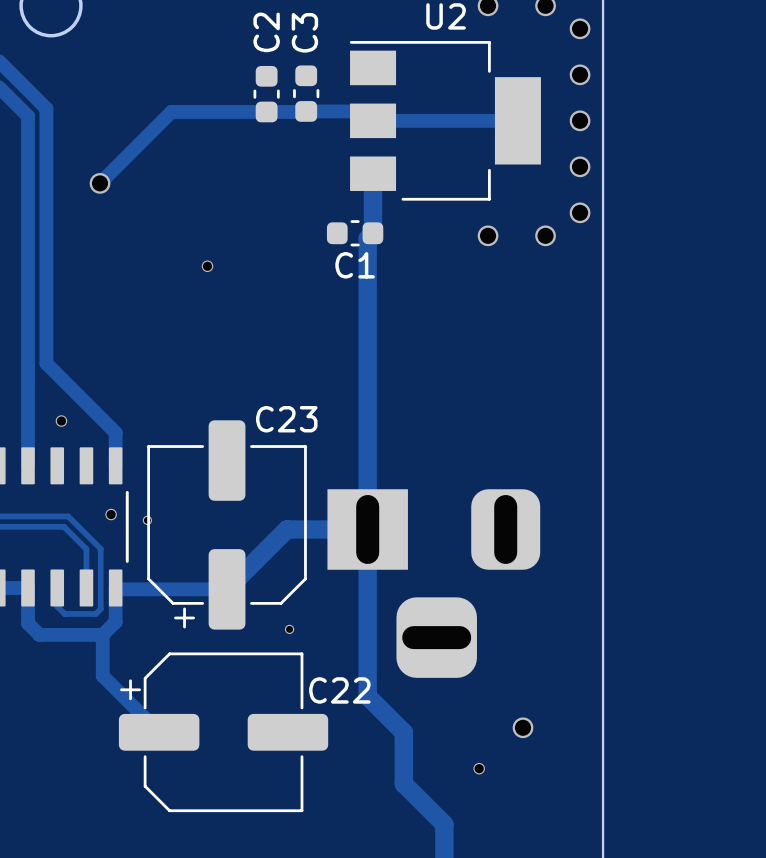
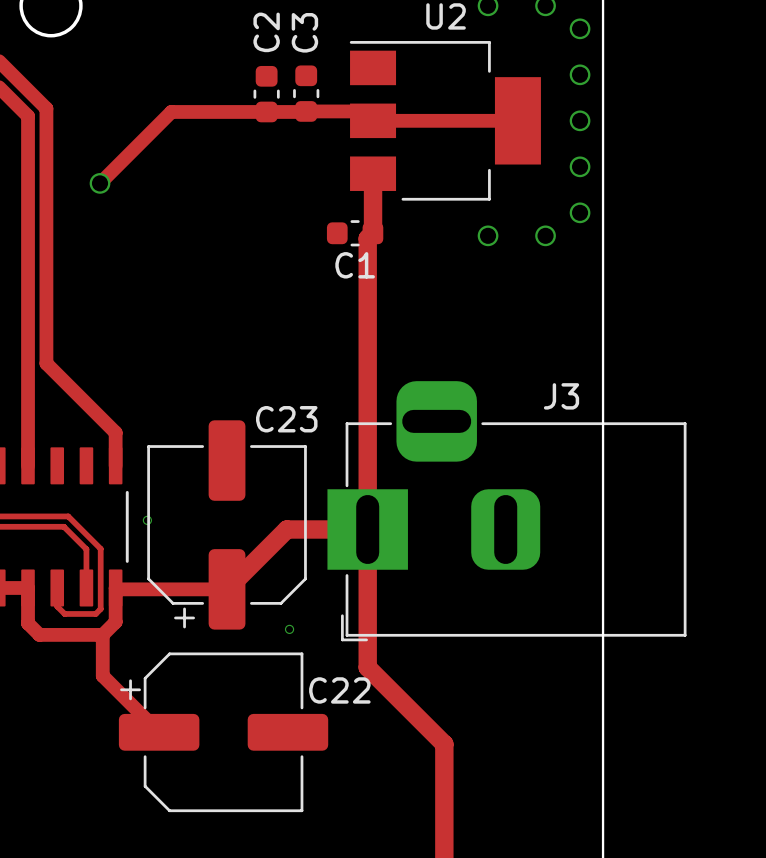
via: (207, 266) -> none
via: (61, 421) -> none
via: (111, 514) -> none
J3 side: bottom (433, 583) -> top (506, 511)
track: (367, 667) (367, 696) (403, 732) (403, 783) (444, 824) -> (367, 667) (444, 744) (444, 824)
via: (523, 727) -> none
via: (479, 768) -> none

